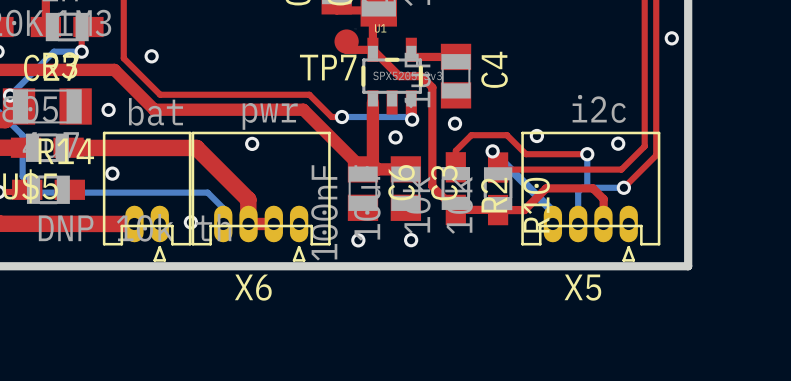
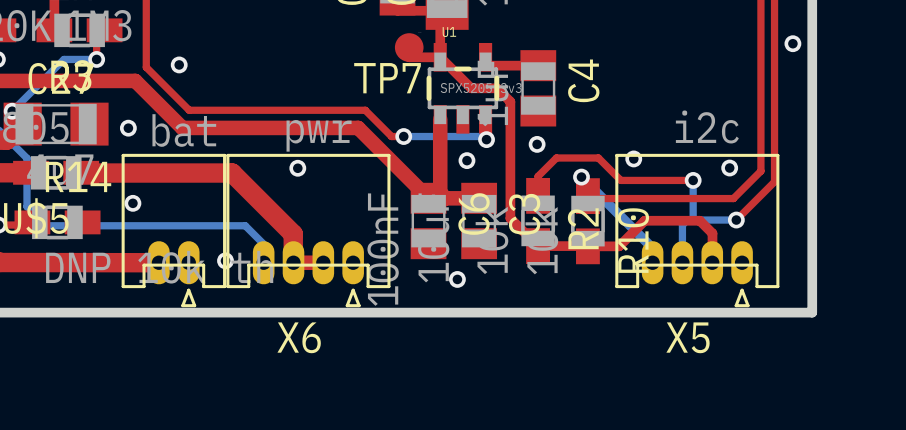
via: none -> (457, 279)
via: (358, 240) -> none
via: (411, 240) -> none

